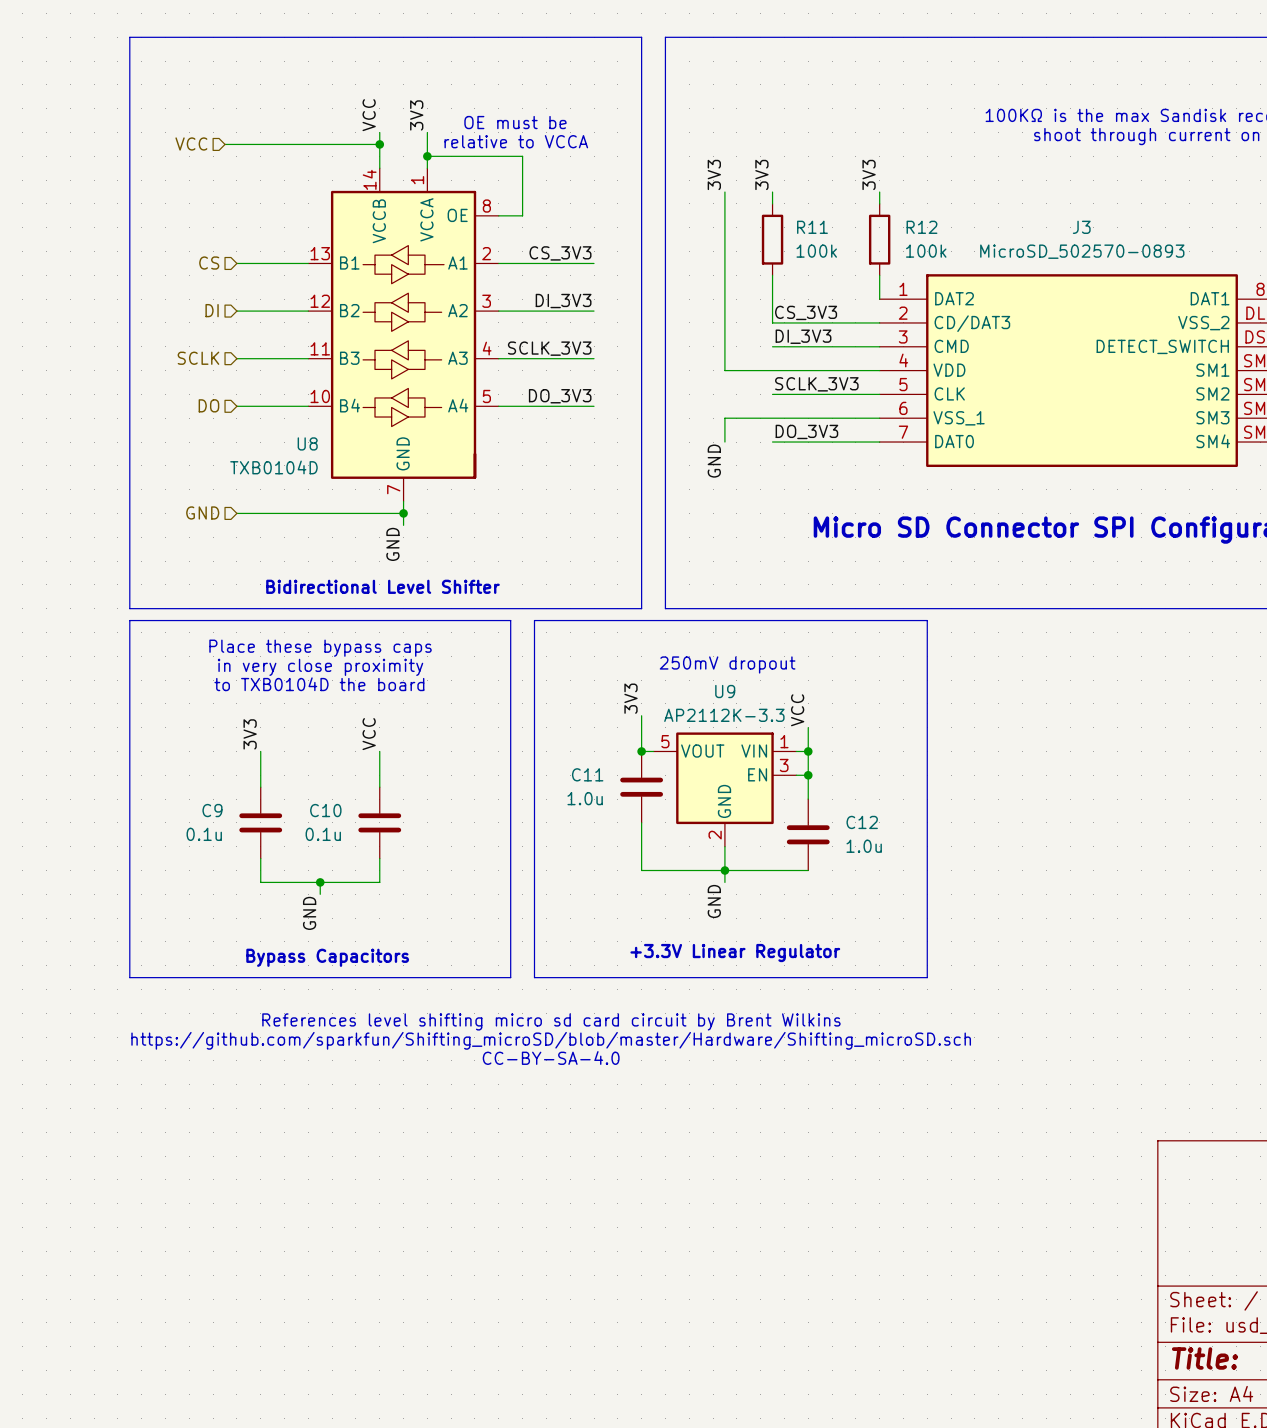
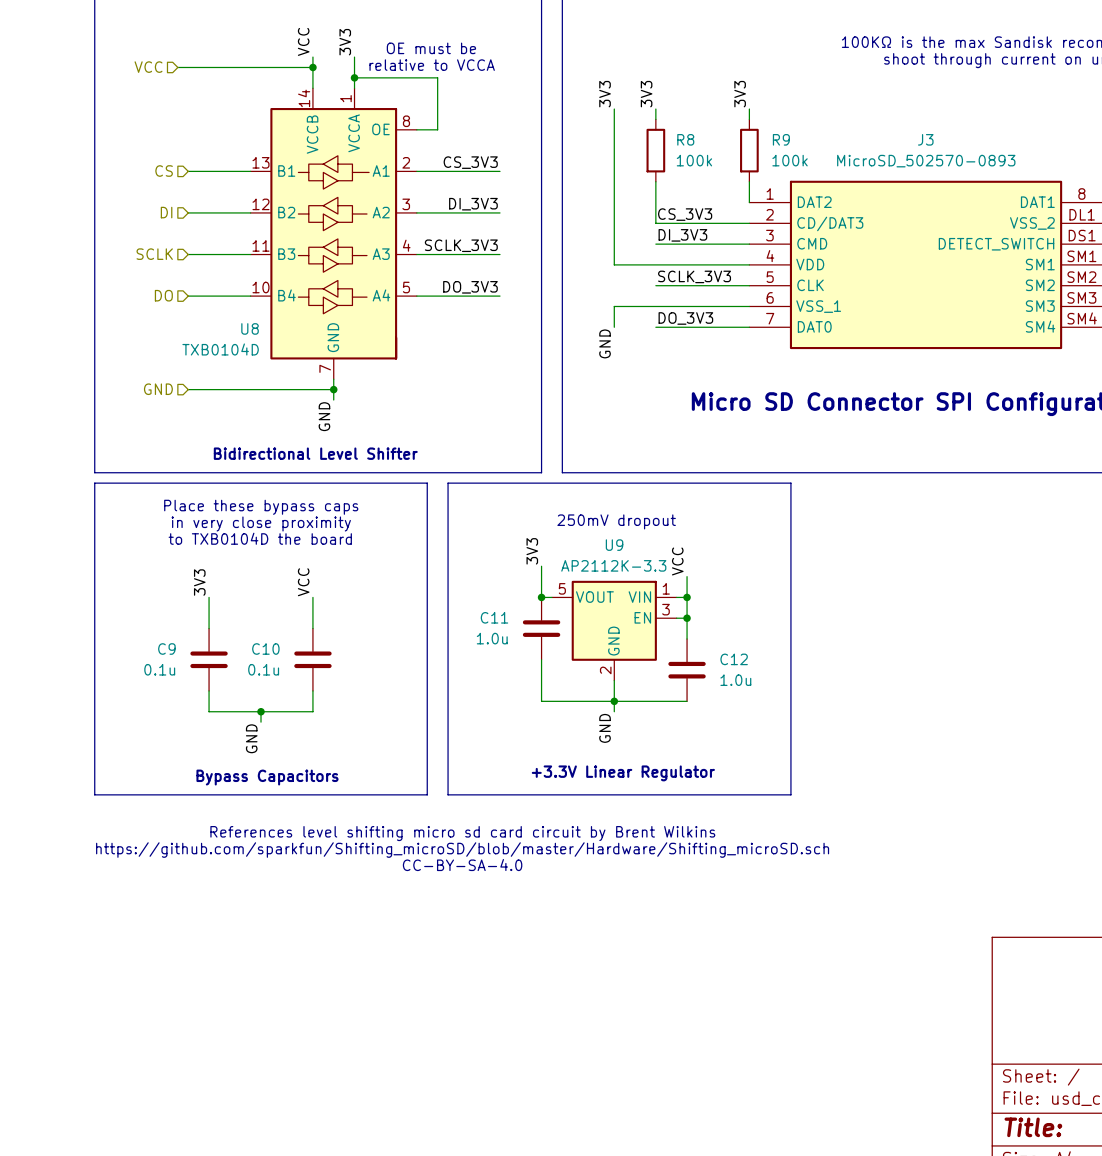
R11 name: R11 (812, 227) -> R8 (685, 139)
R12 name: R12 (921, 227) -> R9 (781, 139)

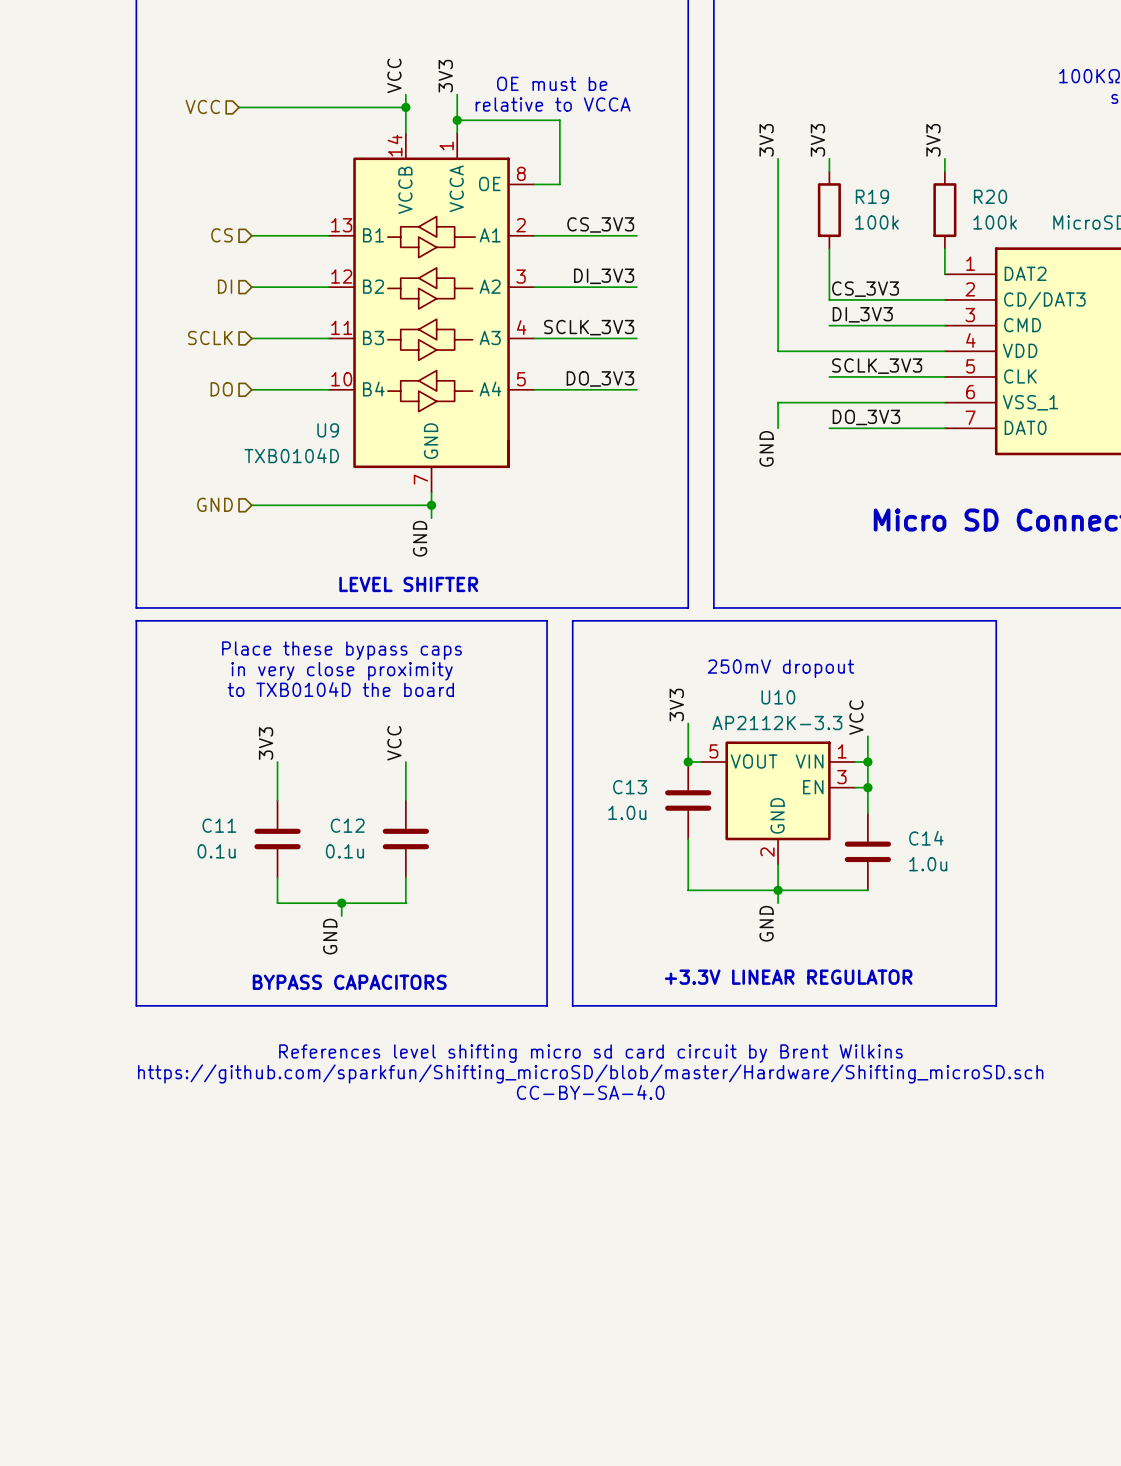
R8 name: R8 (685, 139) -> R19 (872, 196)
R9 name: R9 (781, 139) -> R20 (990, 196)
U8 name: U8 (250, 328) -> U9 (328, 430)
text: Bidirectional Level Shifter (315, 453) -> LEVEL SHIFTER (408, 584)
U9 name: U9 (614, 545) -> U10 (778, 697)
C11 name: C11 (494, 617) -> C13 (630, 787)
C9 name: C9 (166, 649) -> C11 (219, 825)
C10 name: C10 (265, 649) -> C12 (347, 825)
C12 name: C12 (734, 659) -> C14 (926, 838)
text: +3.3V Linear Regulator (623, 773) -> +3.3V LINEAR REGULATOR (788, 977)
text: Bypass Capacitors (267, 777) -> BYPASS CAPACITORS (349, 982)

